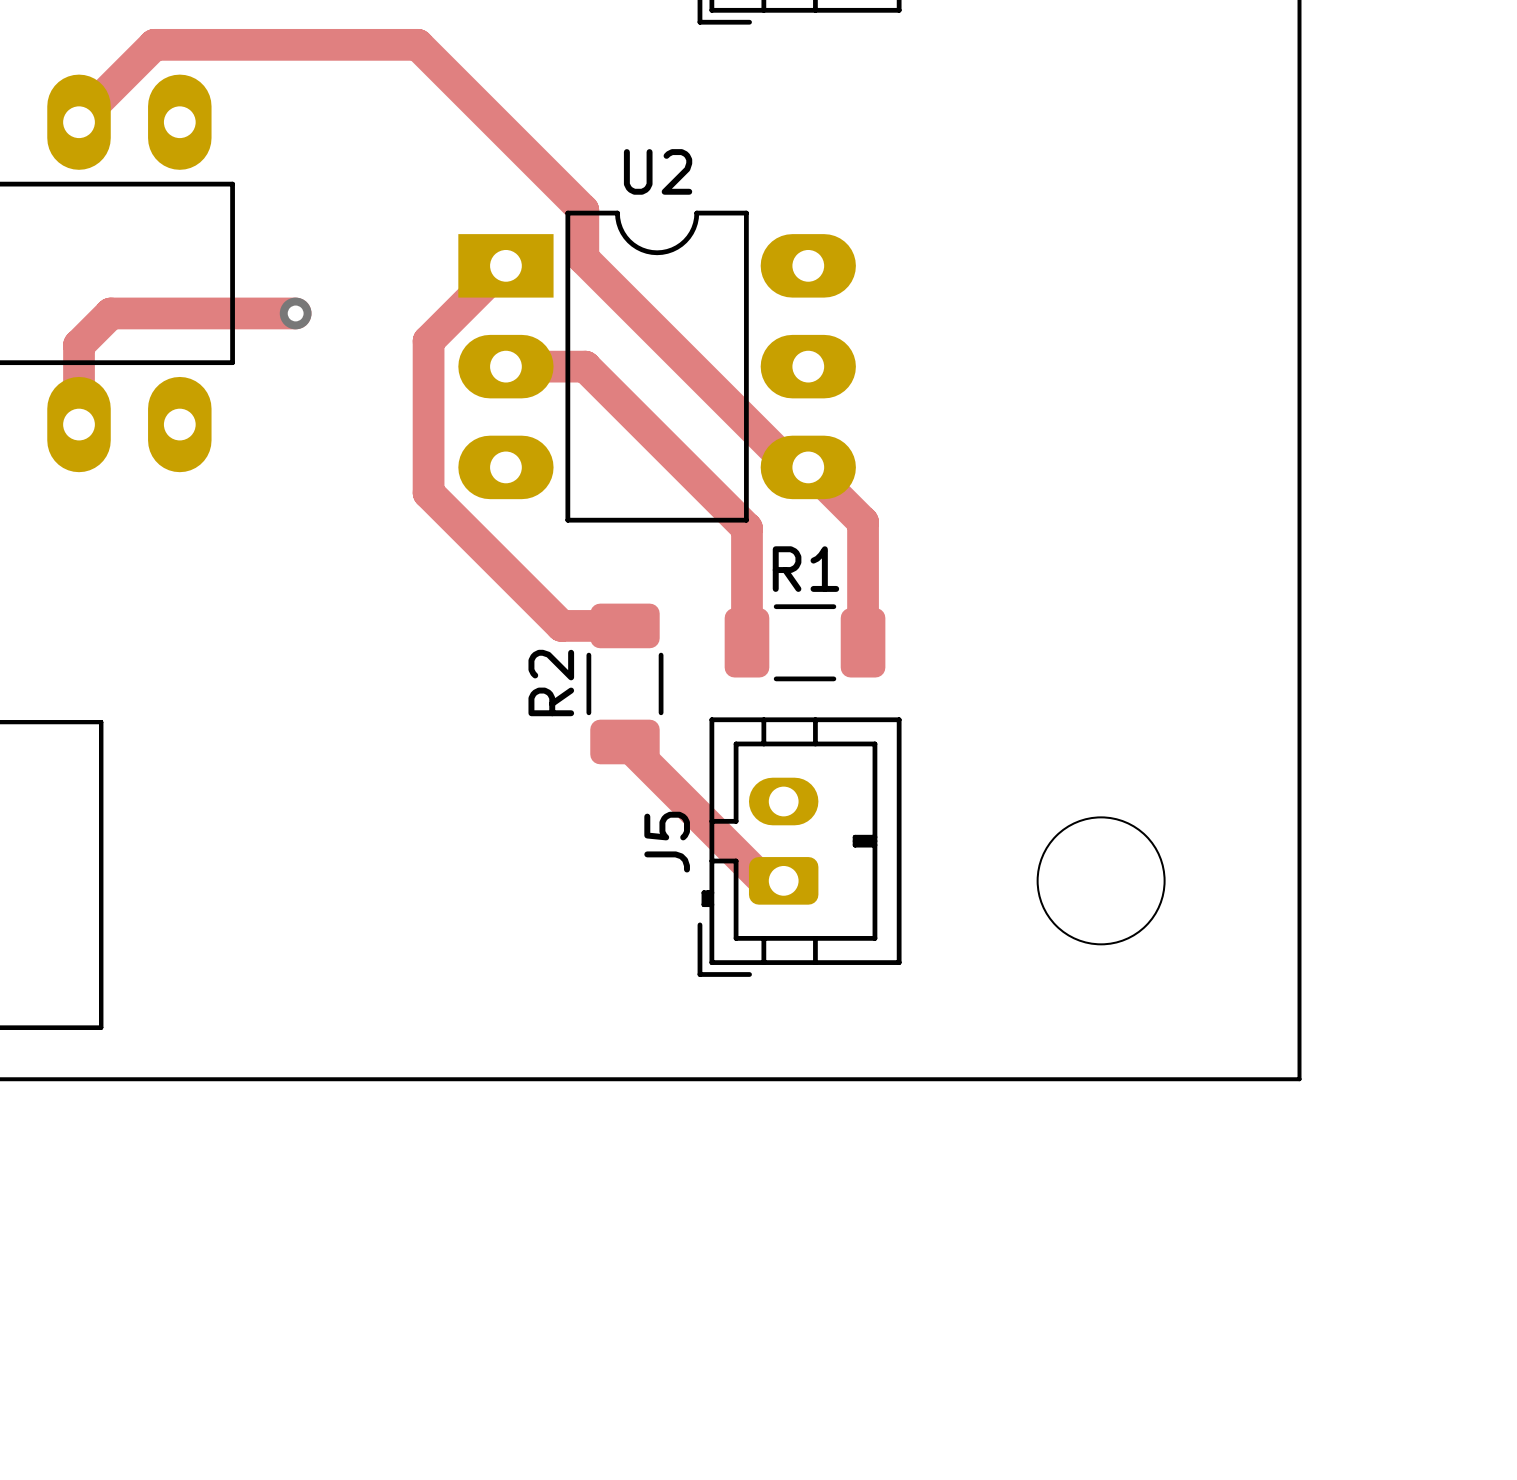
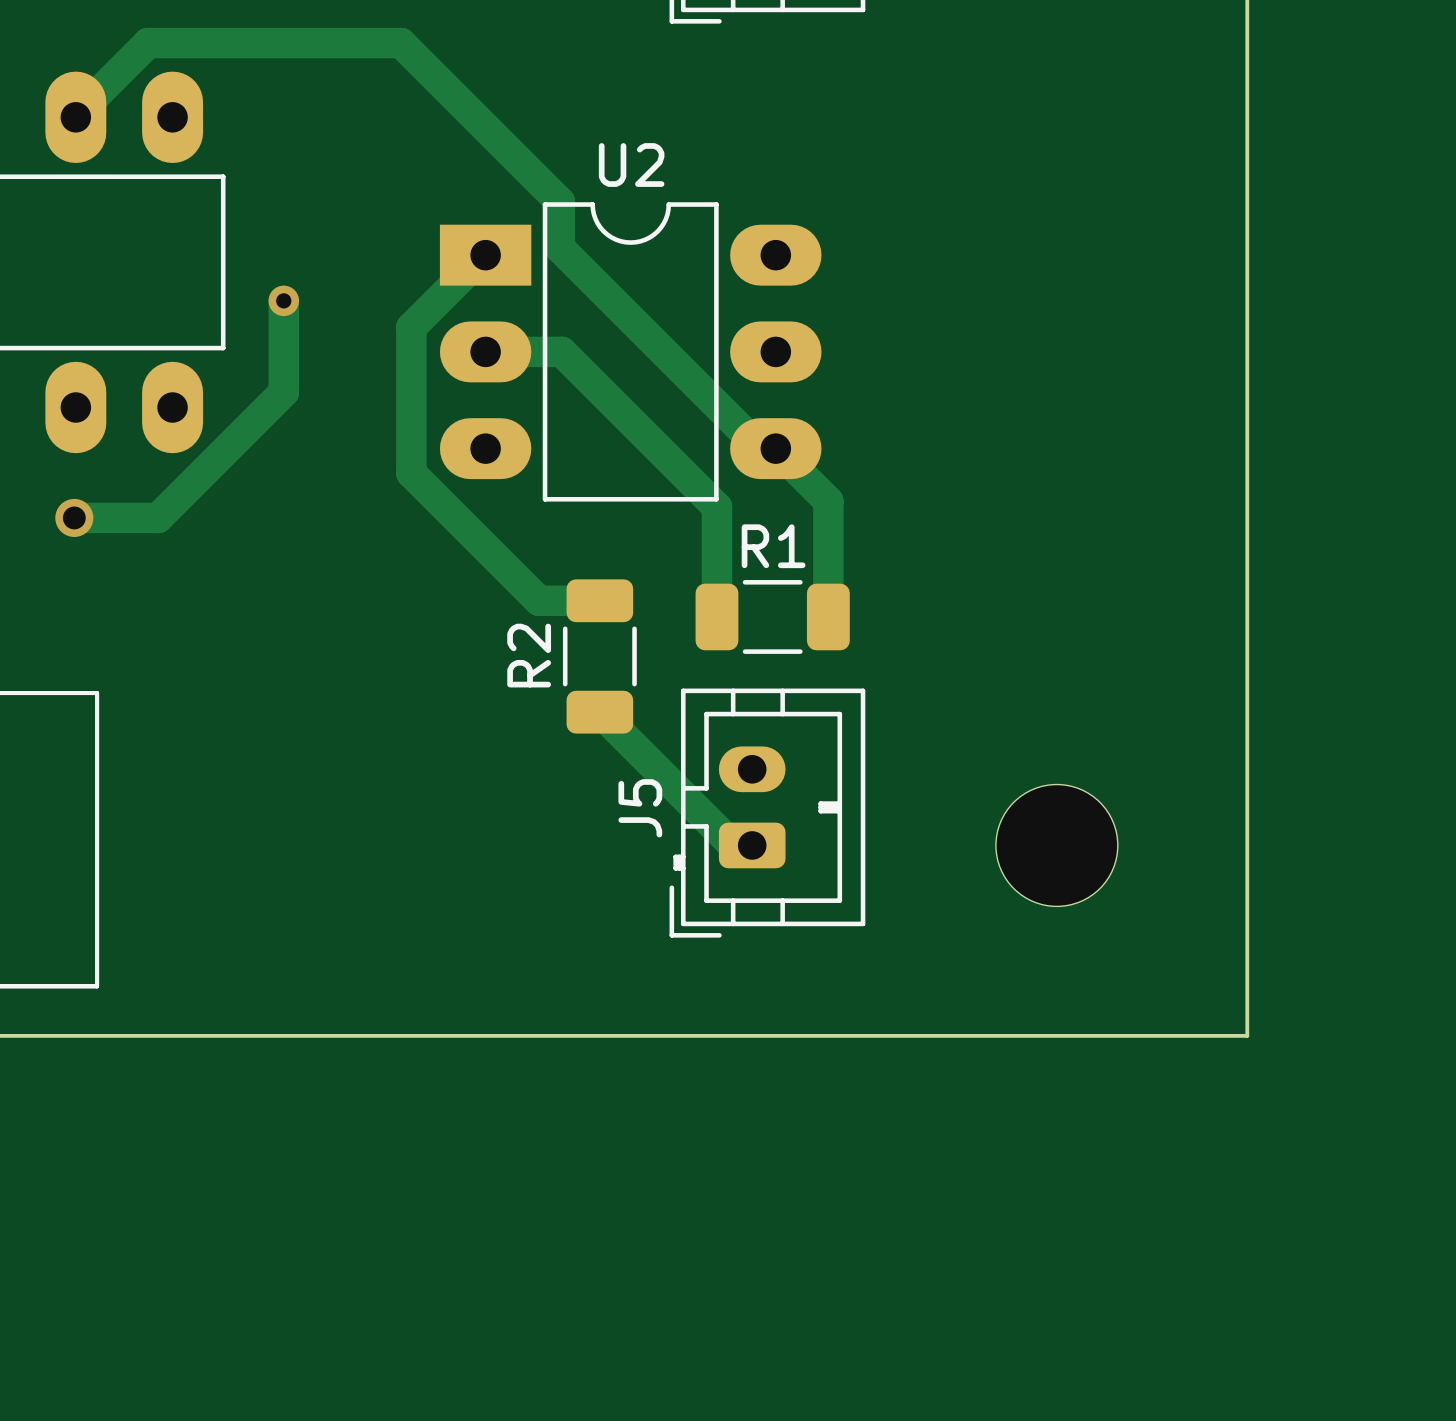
track: (295, 313) (110, 313) (79, 345) (79, 424) -> (283, 300) (283, 392) (158, 517) (74, 517)
via: none -> (74, 517)

